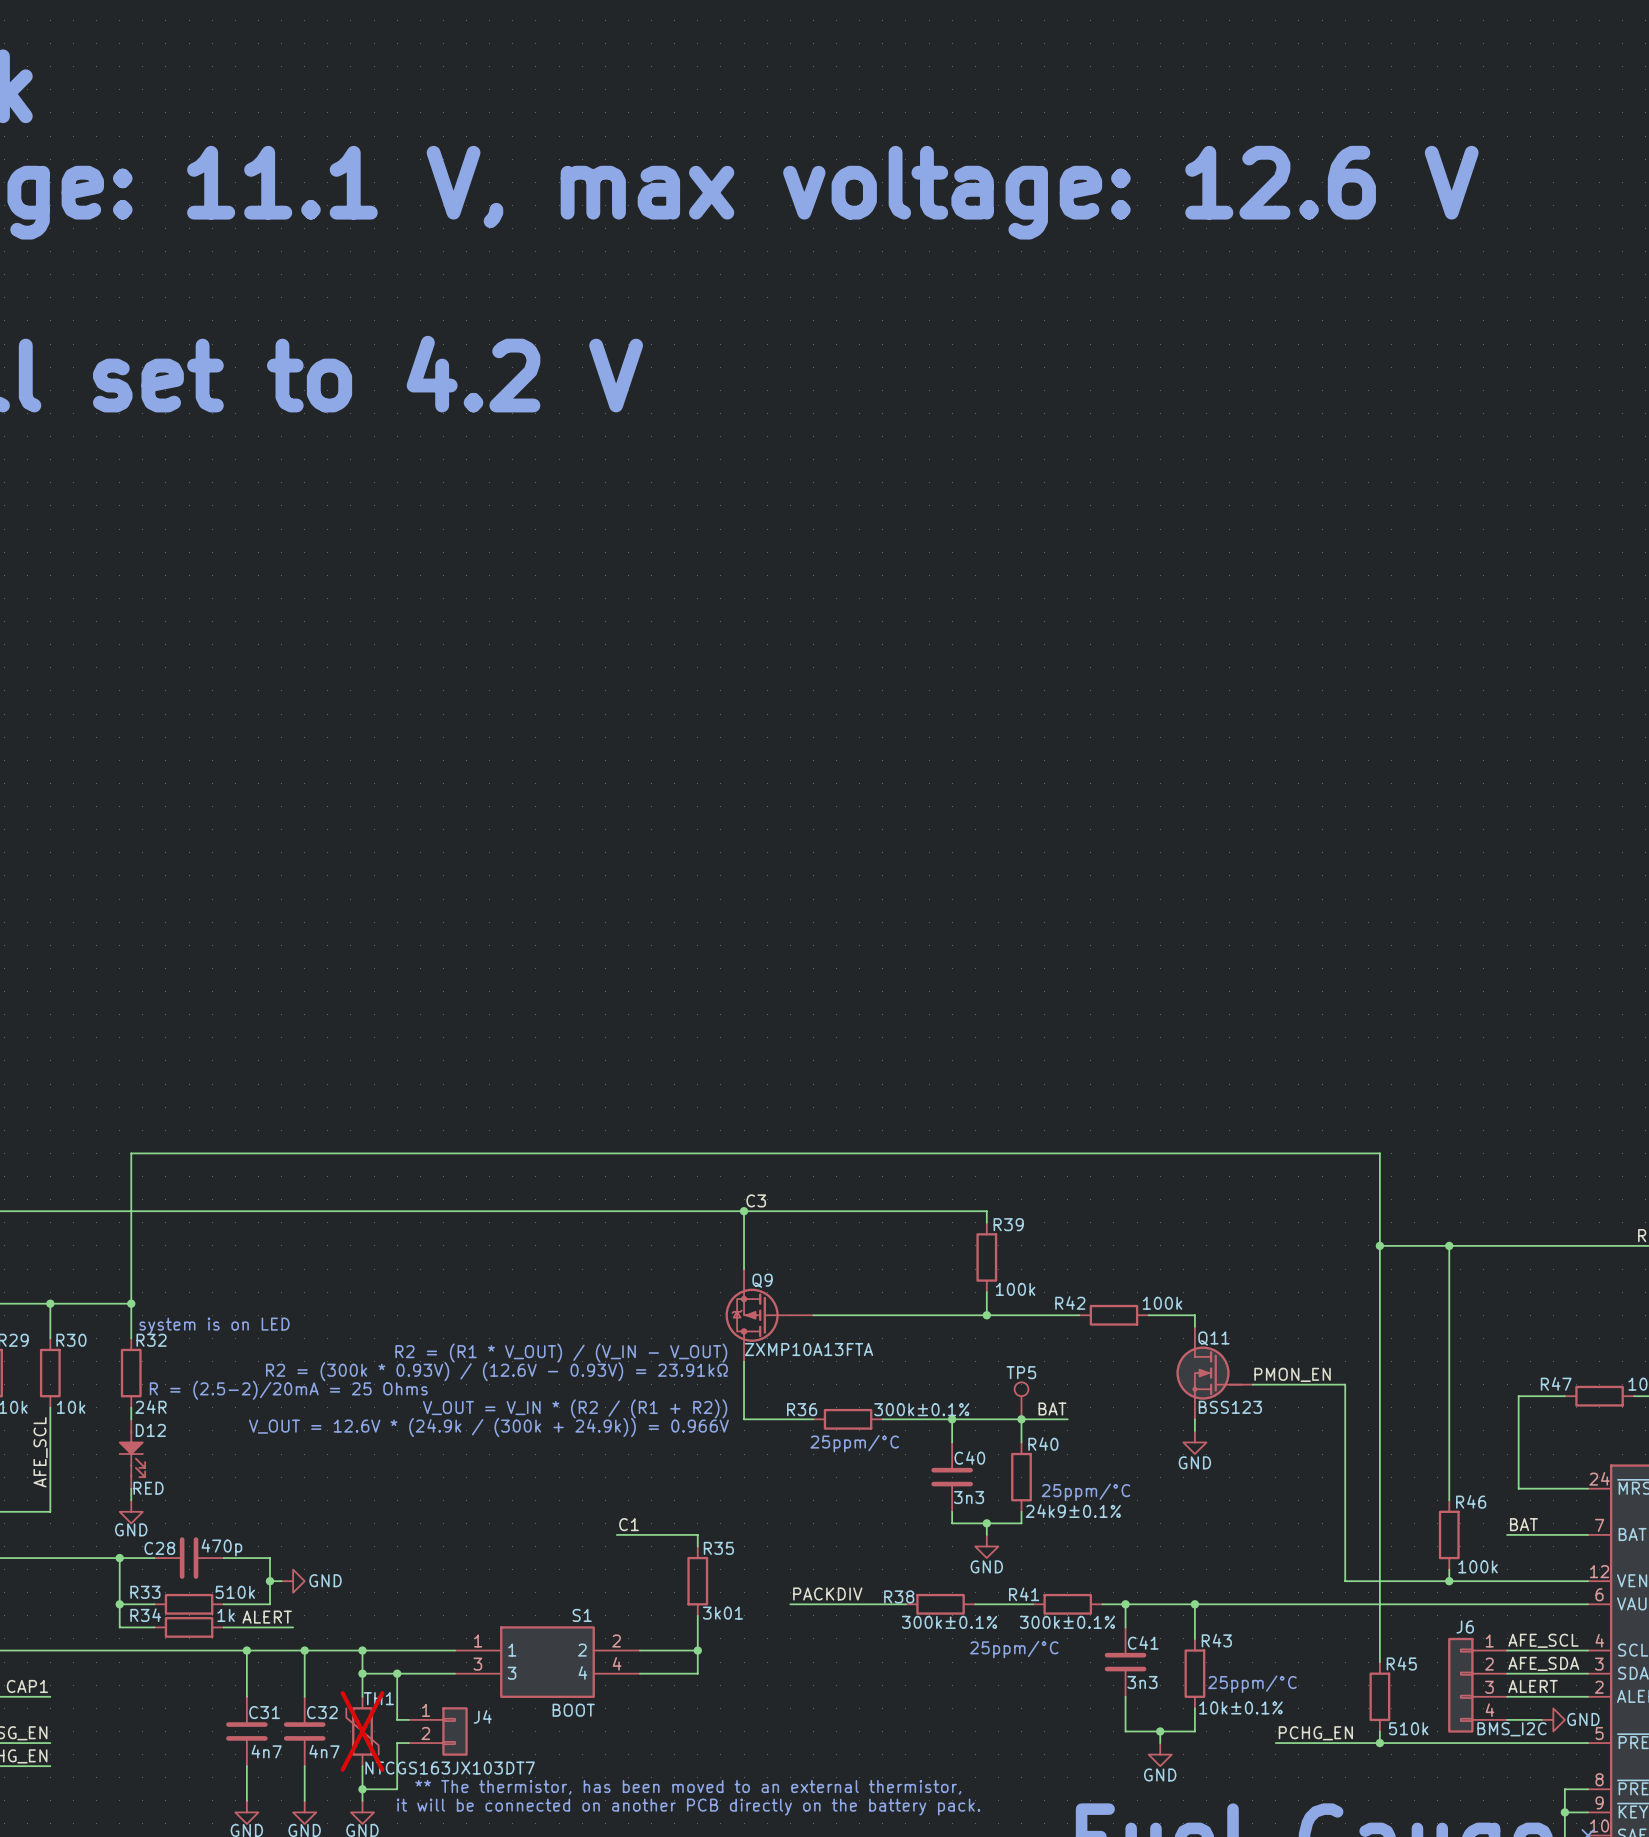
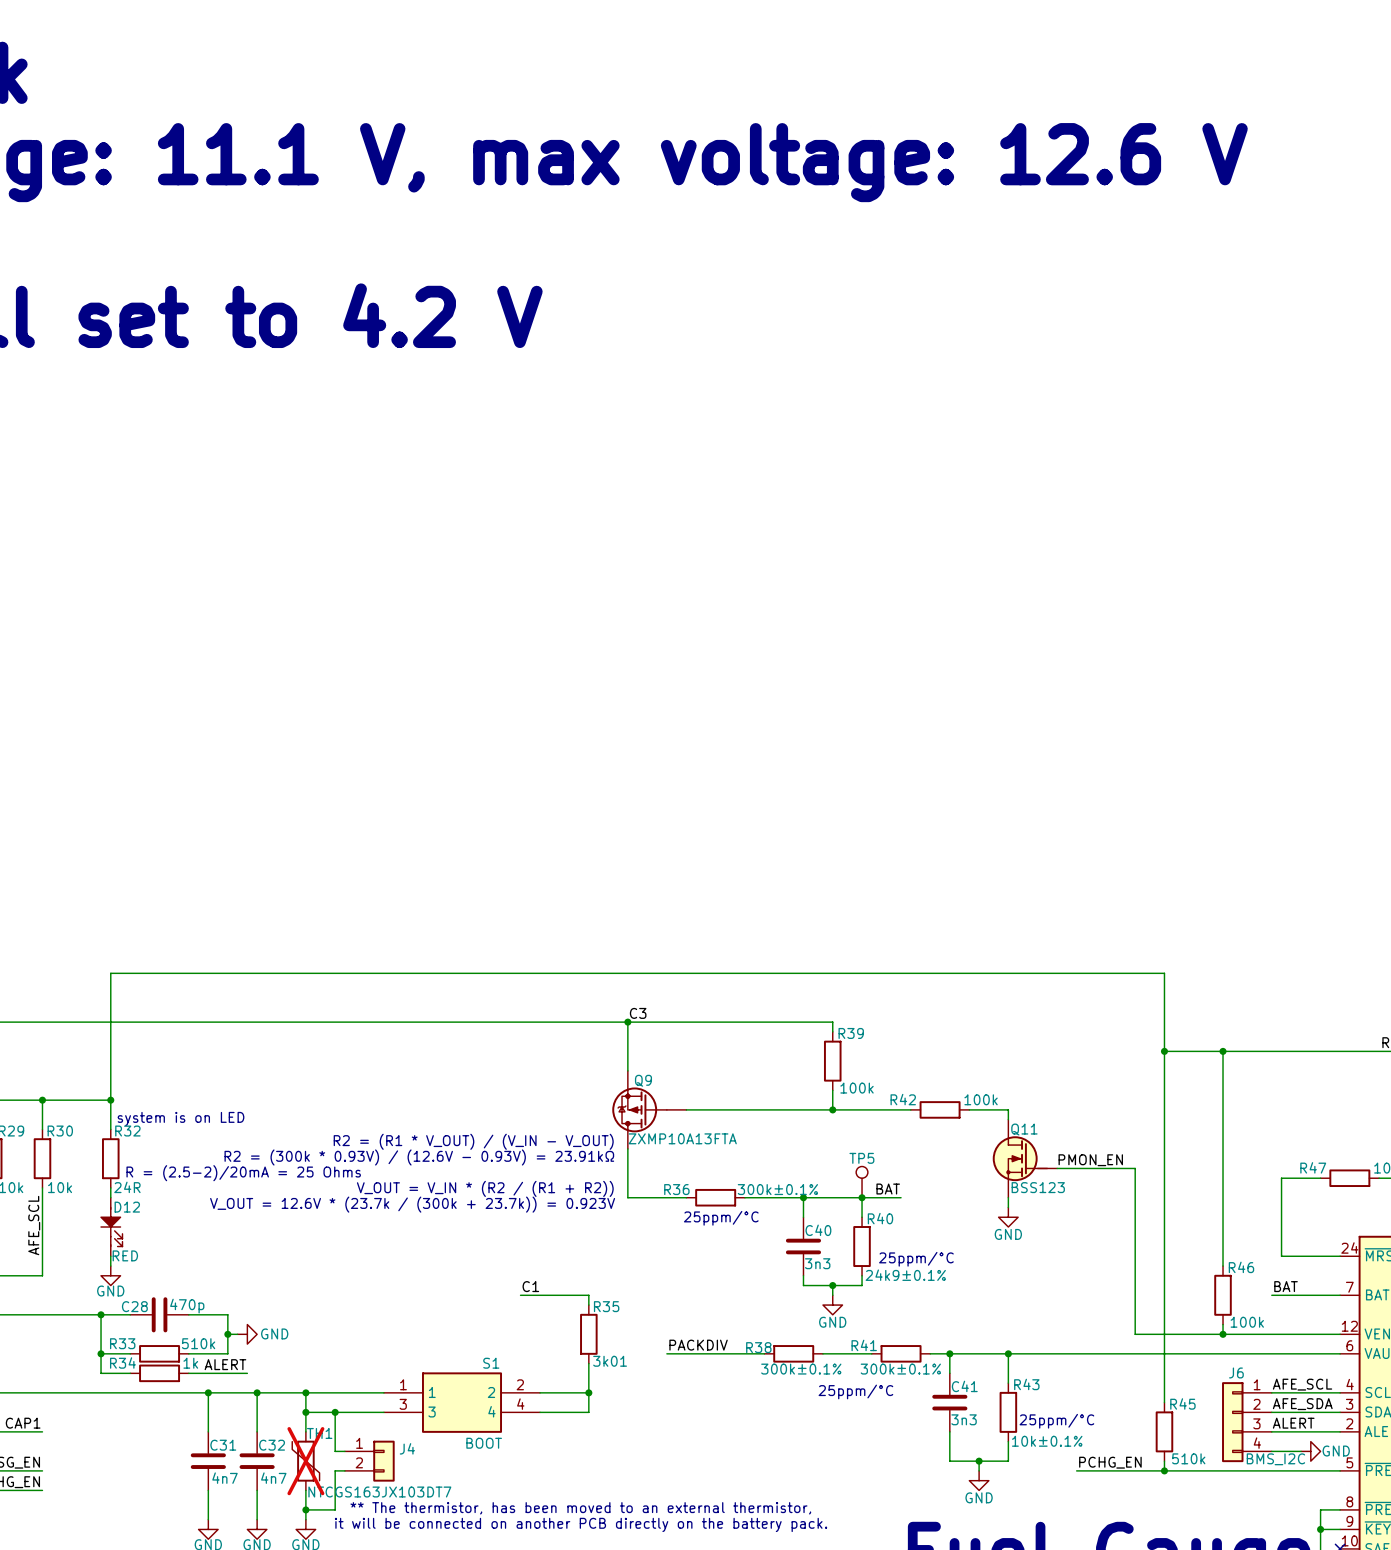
text: V_OUT = 12.6V * (24.9k / (300k + 24.9k)) = 0.966V (488, 1427) -> V_OUT = 12.6V * (23.7k / (300k + 23.7k)) = 0.923V (412, 1204)

